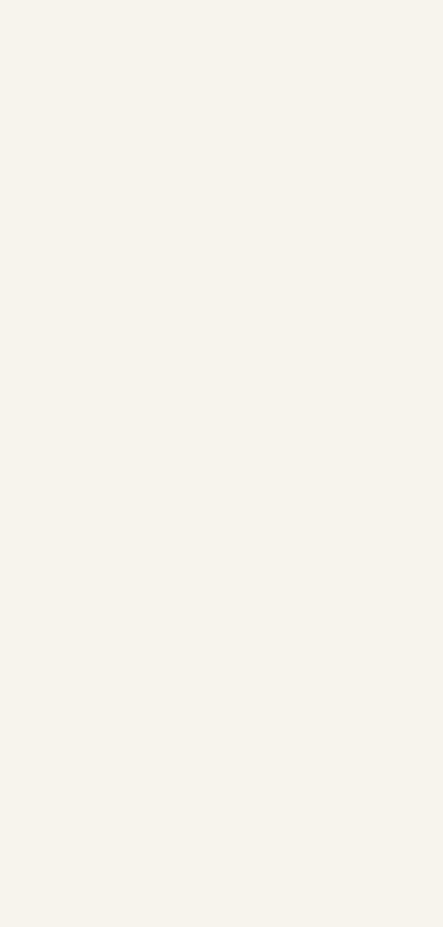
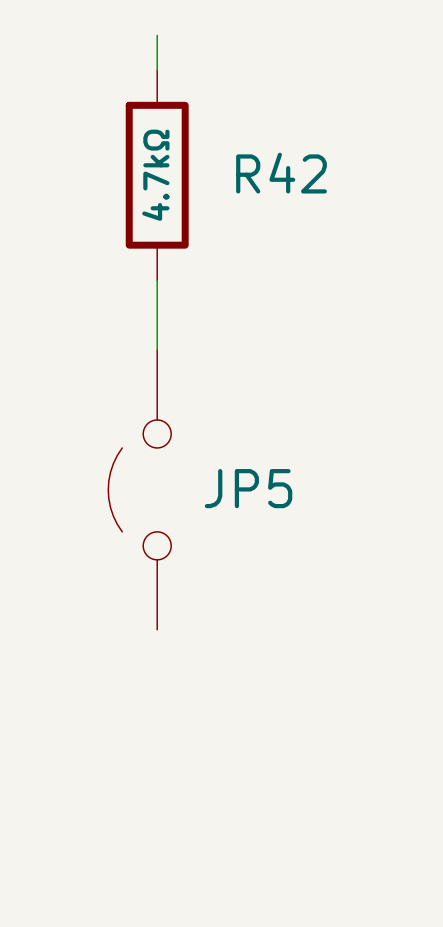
wire: none -> (157, 35) (157, 70)
R42: none -> 4.7kΩ (157, 175)
wire: none -> (157, 280) (157, 350)
JP5: none -> (139, 489)

